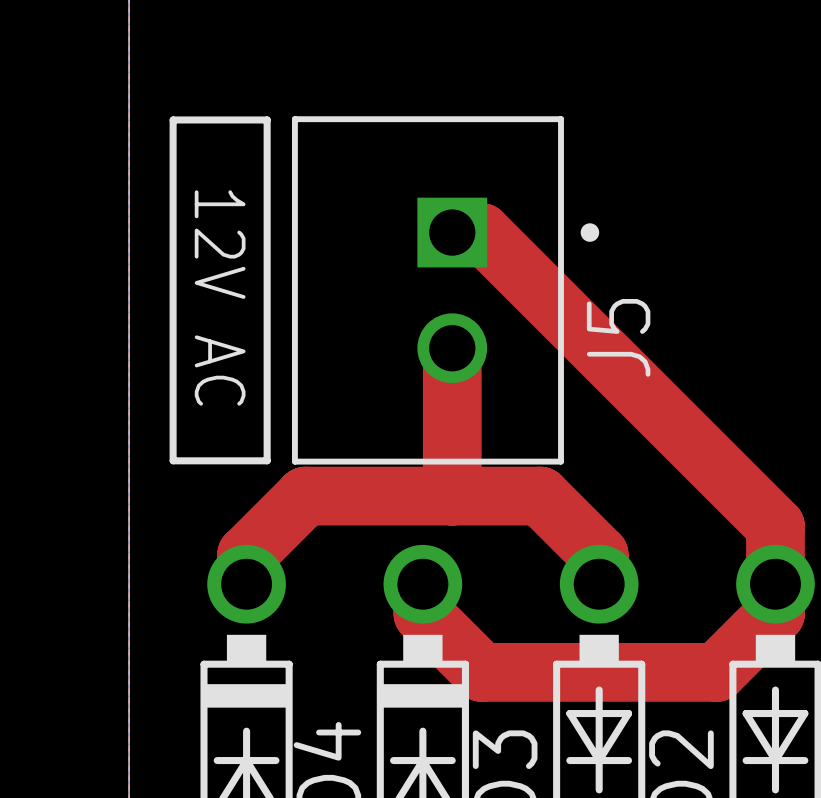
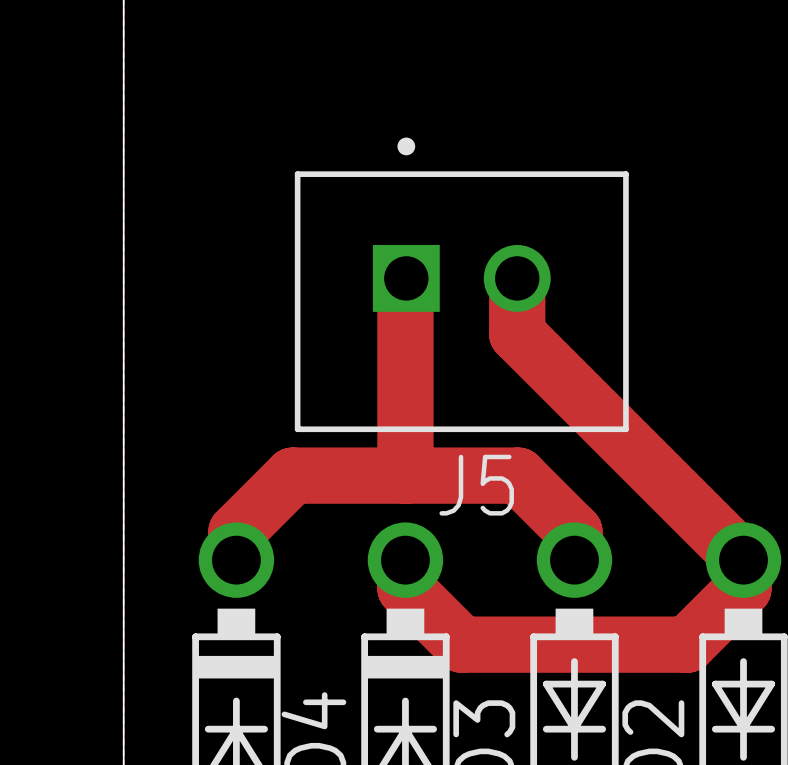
line: (173, 119) (267, 119) (267, 460) (173, 460) (173, 119) -> none
top track: (452, 232) (481, 232) (775, 526) (775, 584) -> (517, 278) (517, 333) (743, 560)
top track: none -> (406, 278) (405, 475)
J5 rotation: 0° (445, 290) -> 90° counterclockwise (461, 284)
text: 12V AC (220, 297) -> none
J5 name position: J5 (618, 337) -> J5 (476, 485)
top track: (452, 348) (452, 496) -> none

